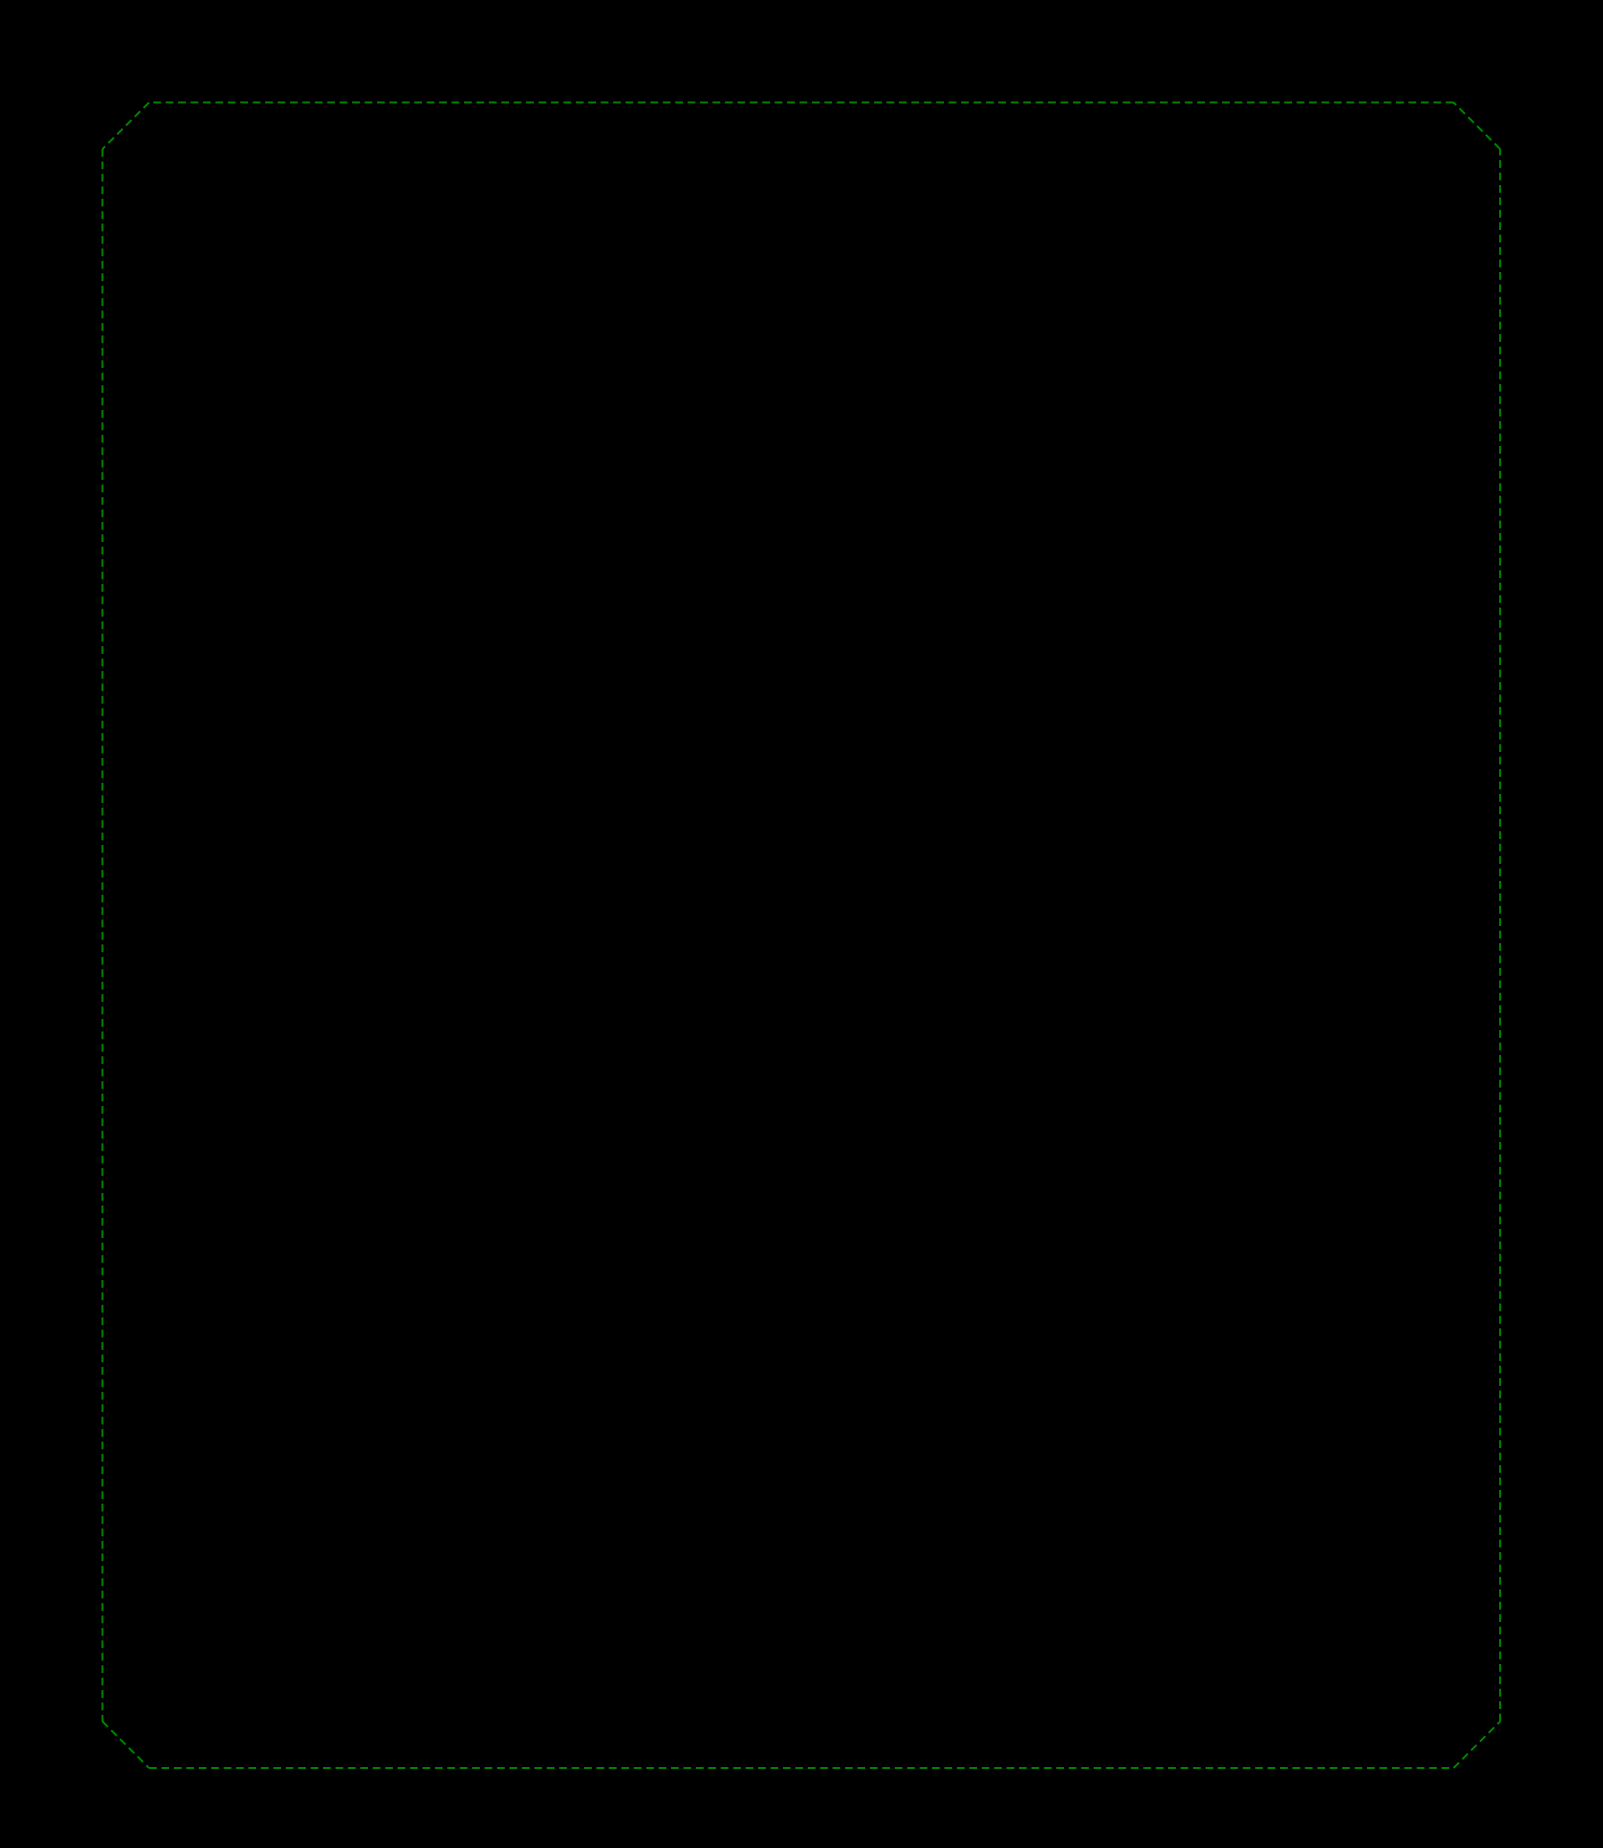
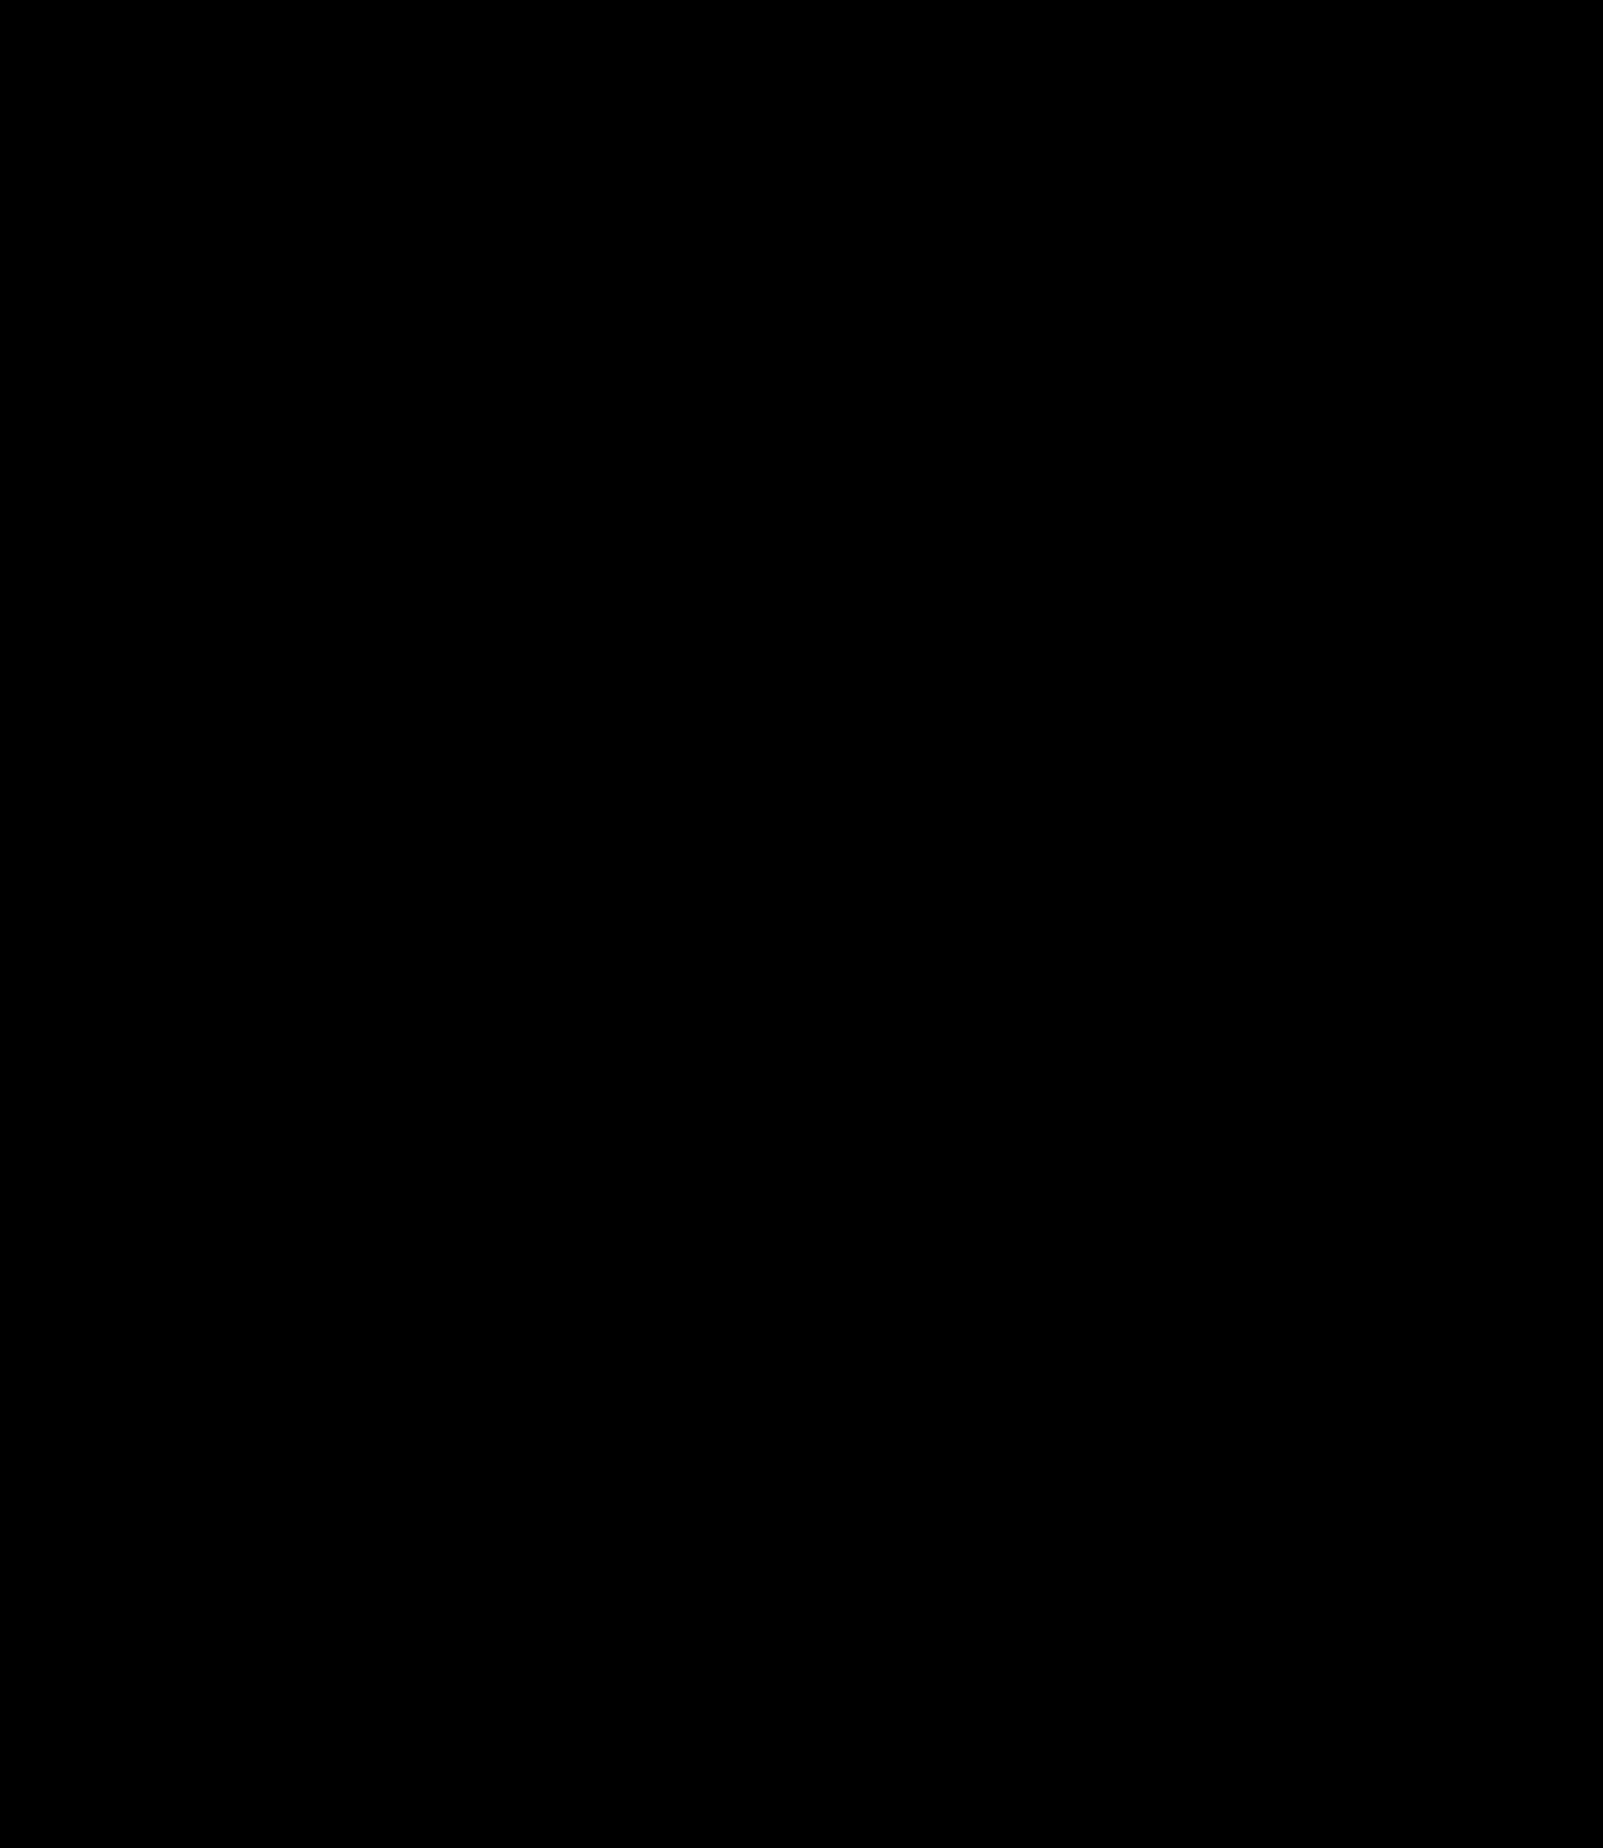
zone outline: (1453, 102) (1500, 149) (1500, 1721) (1453, 1768) (149, 1768) (102, 1721) (102, 149) (149, 102) (1453, 102) -> none

